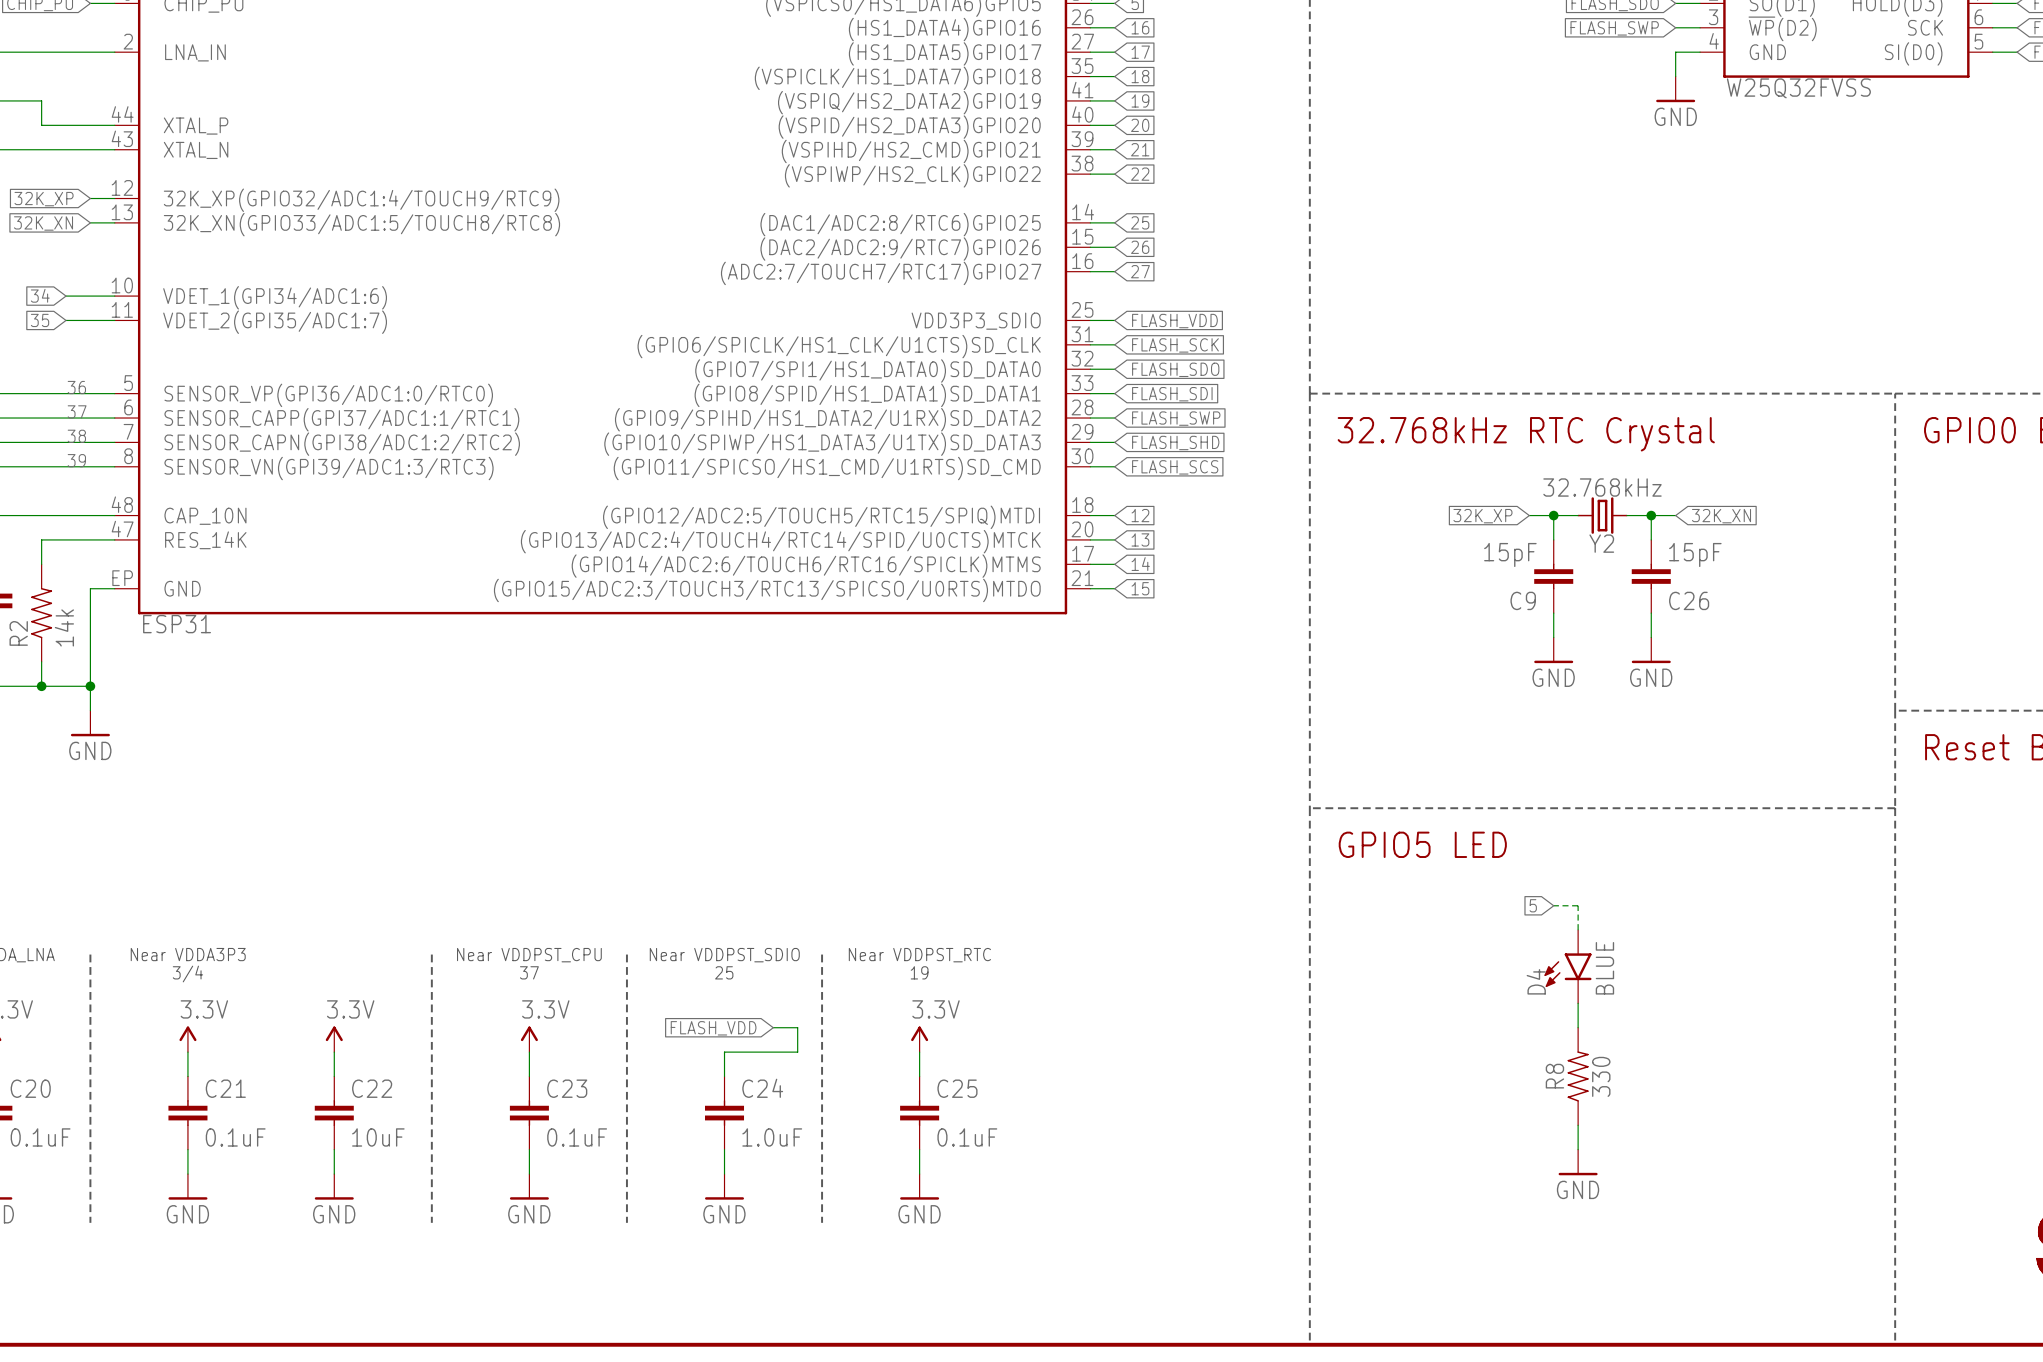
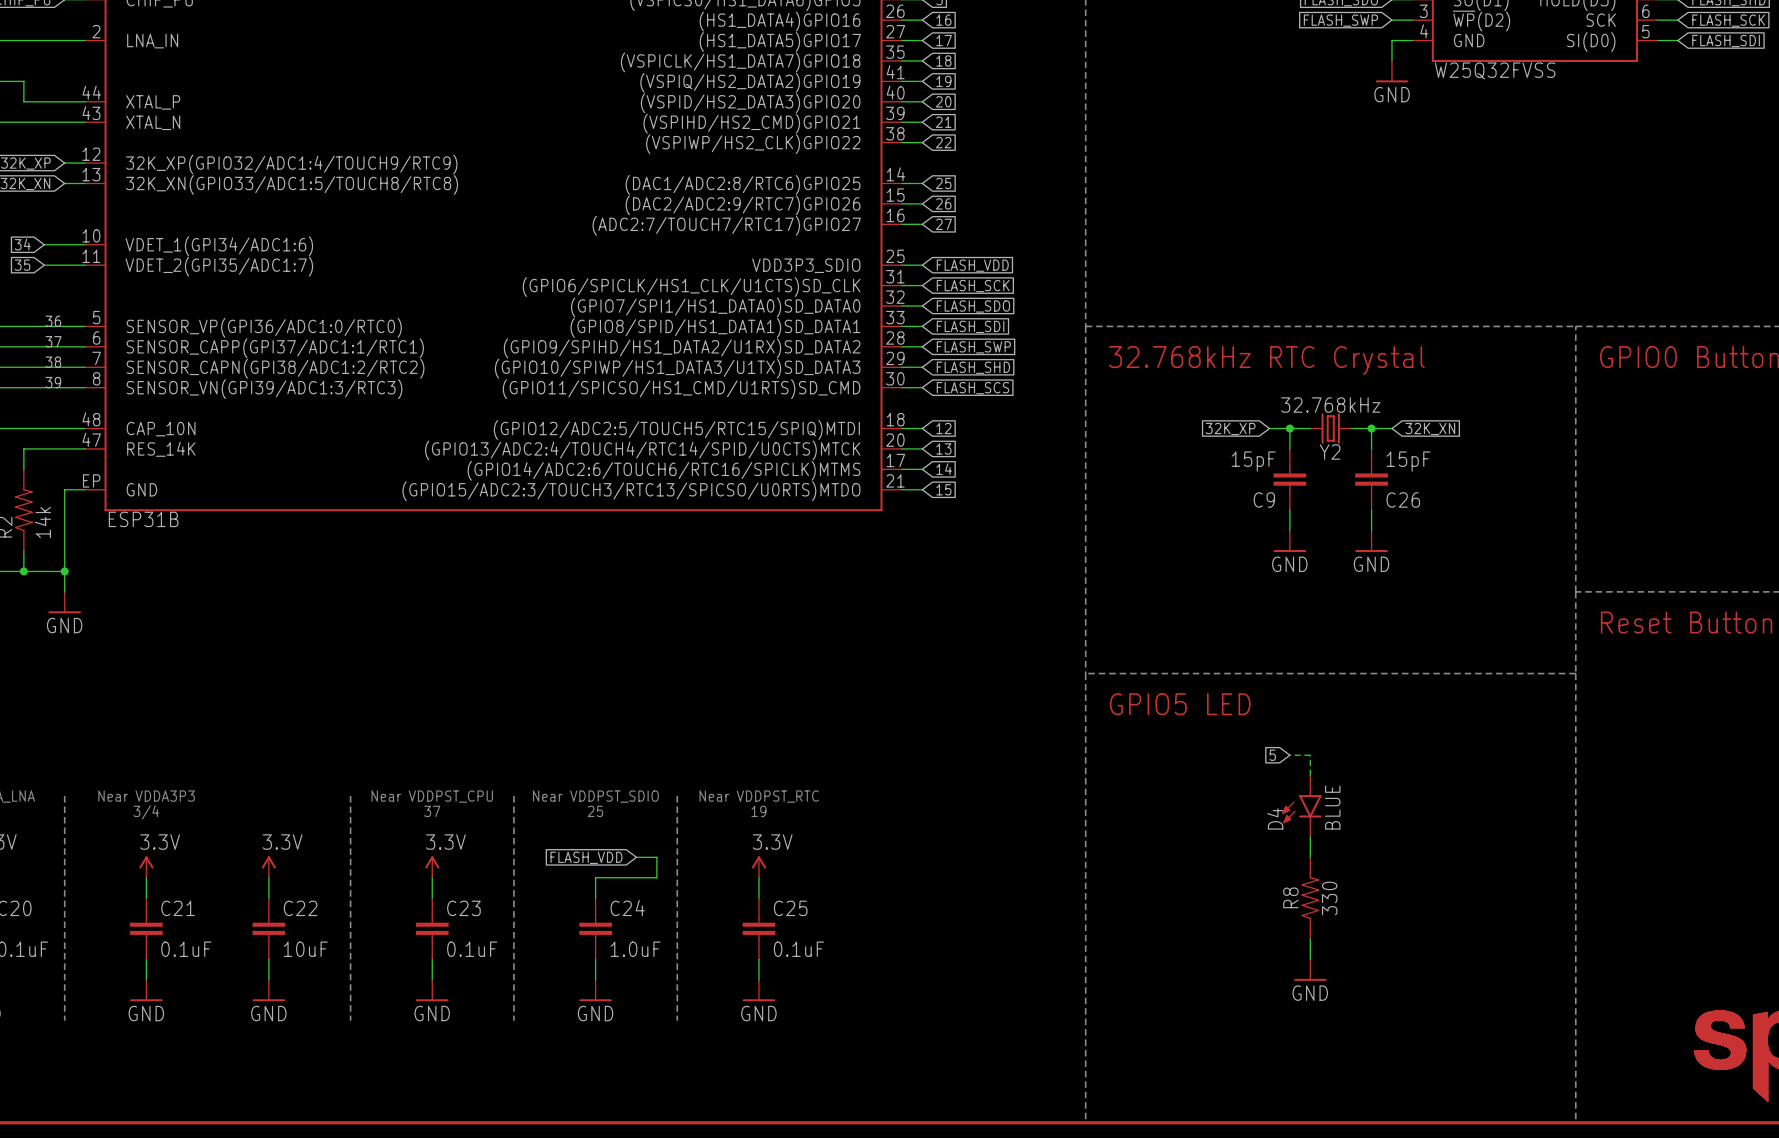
part value: ESP31 (177, 624) -> ESP31B (143, 519)

